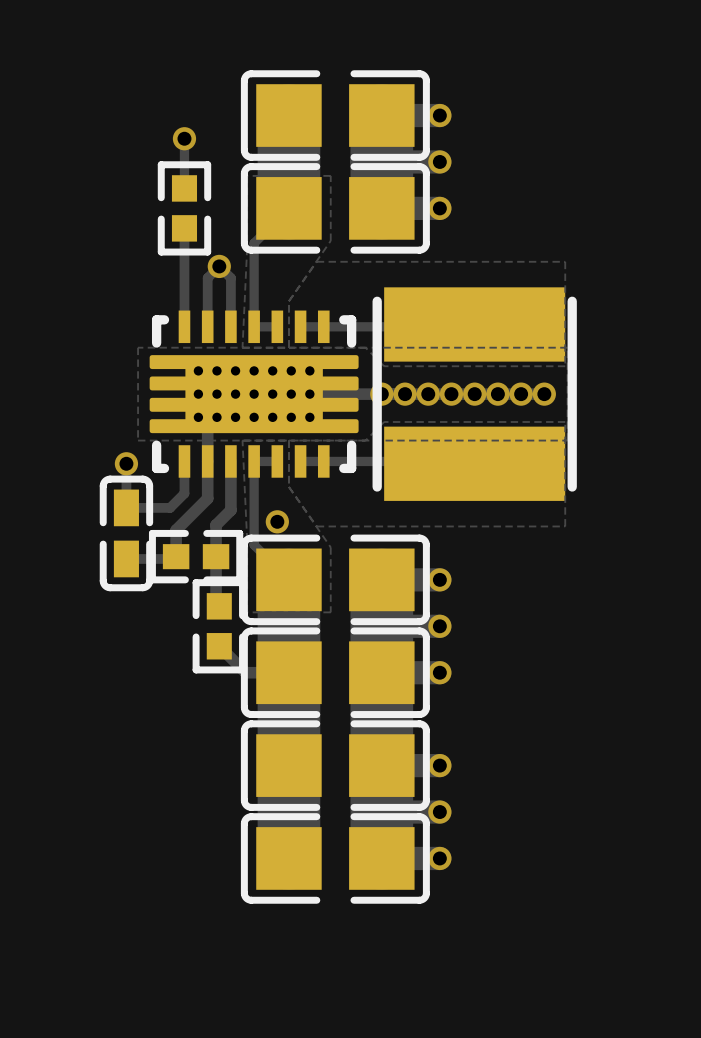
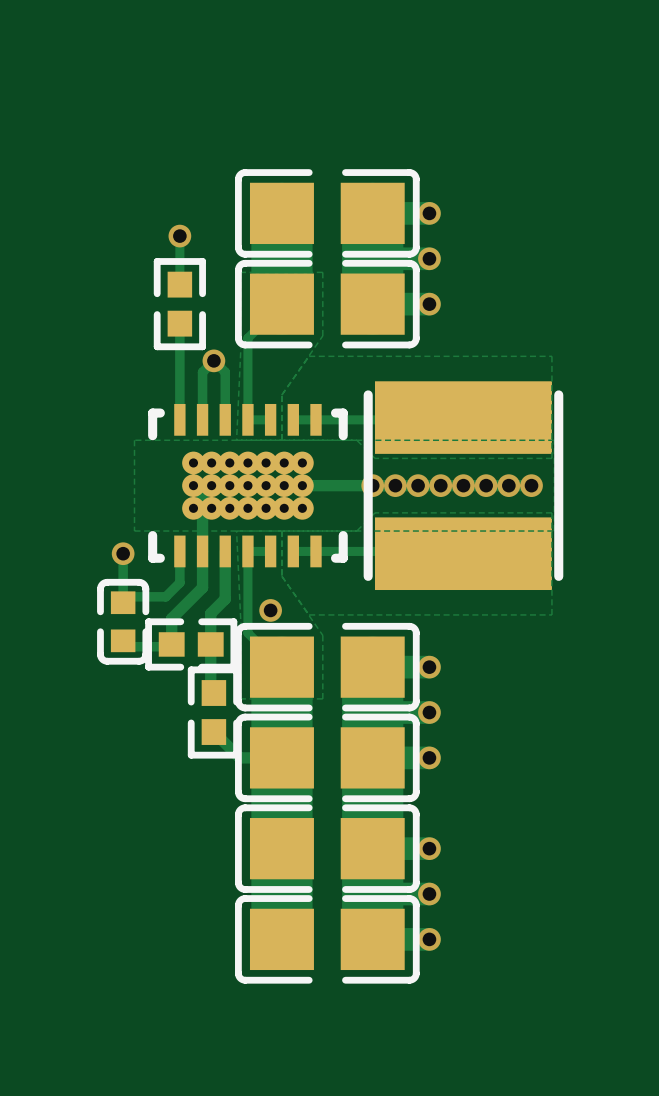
part footprint: [149, 310, 359, 492] -> [148, 403, 348, 581]
part footprint: [99, 475, 154, 592] -> [97, 578, 150, 665]

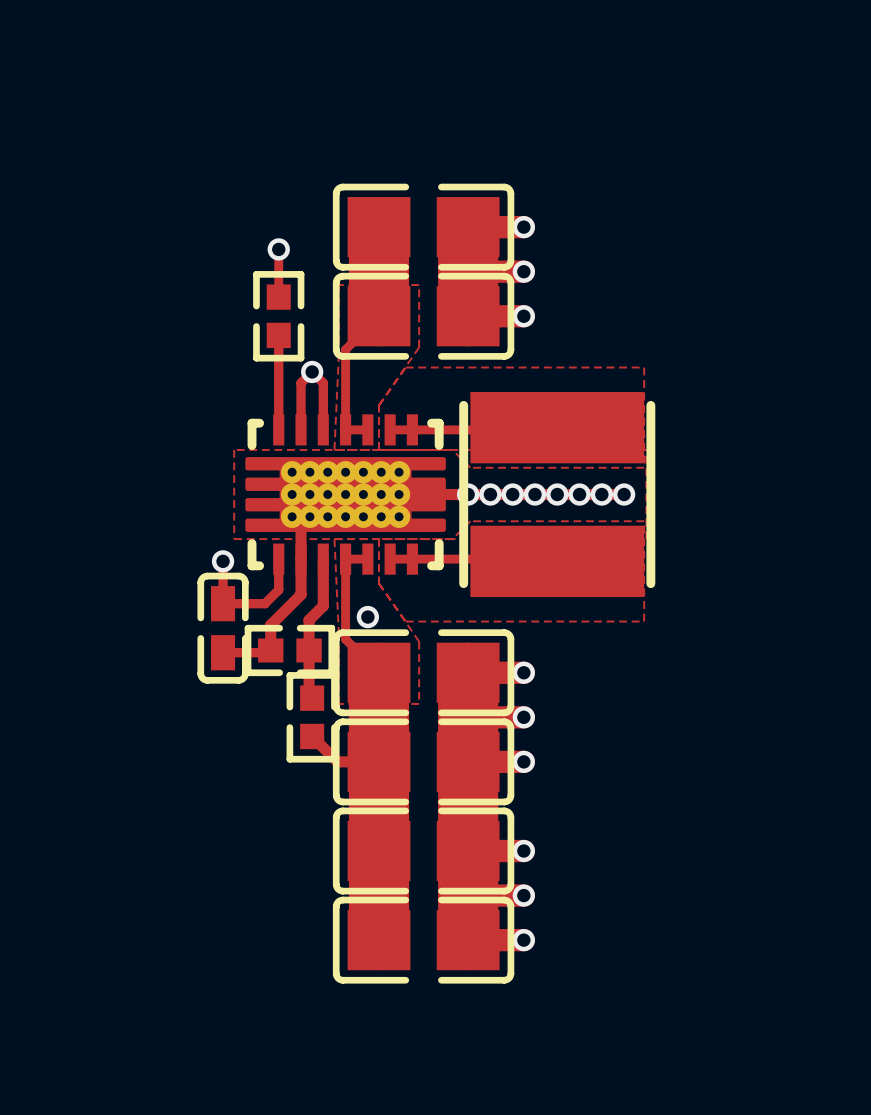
part footprint: [148, 403, 348, 581] -> [245, 414, 446, 588]
part footprint: [97, 578, 150, 665] -> [197, 572, 249, 684]

